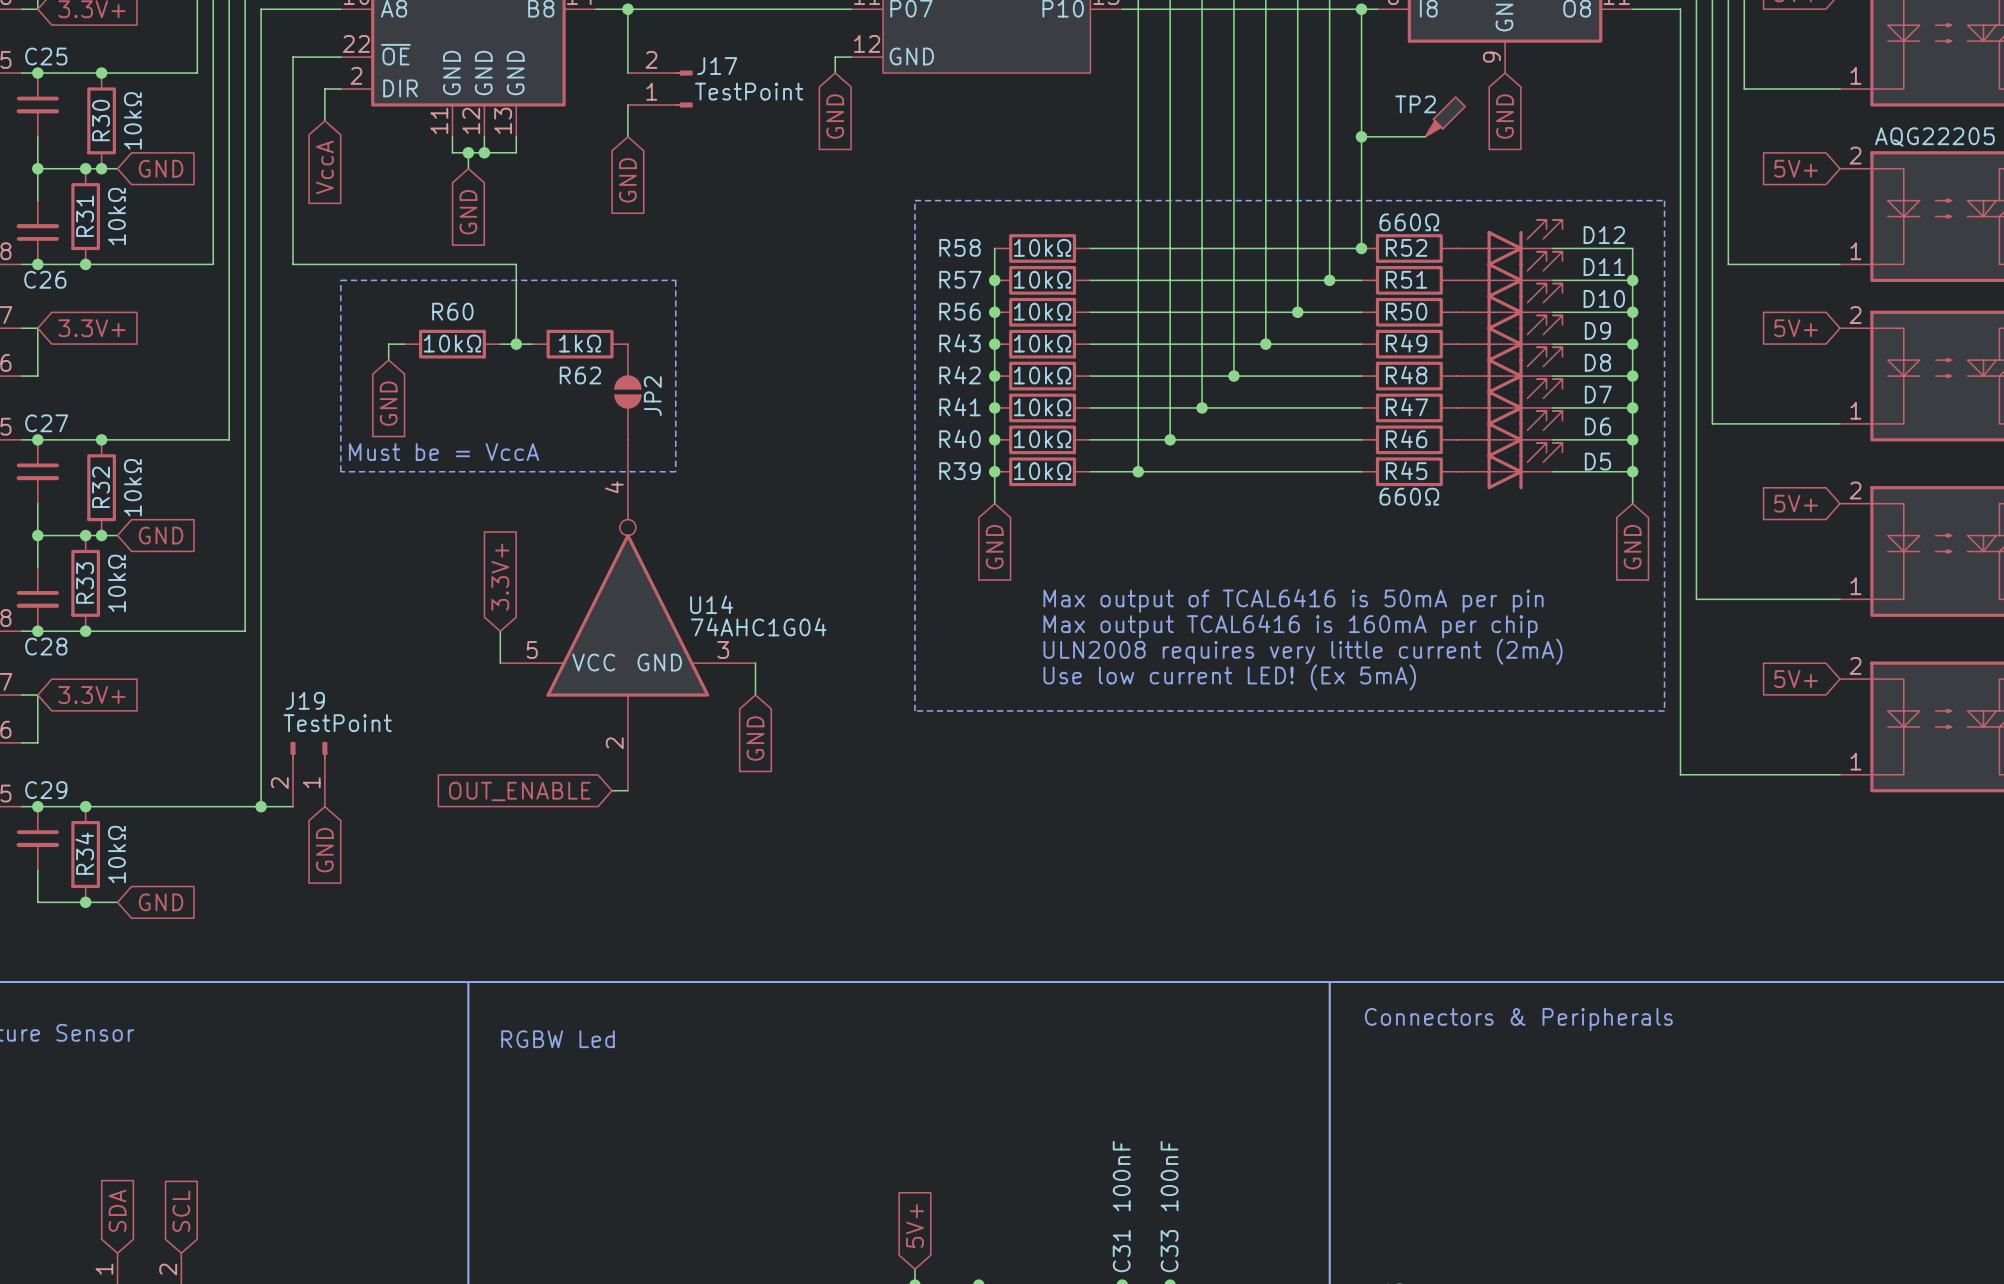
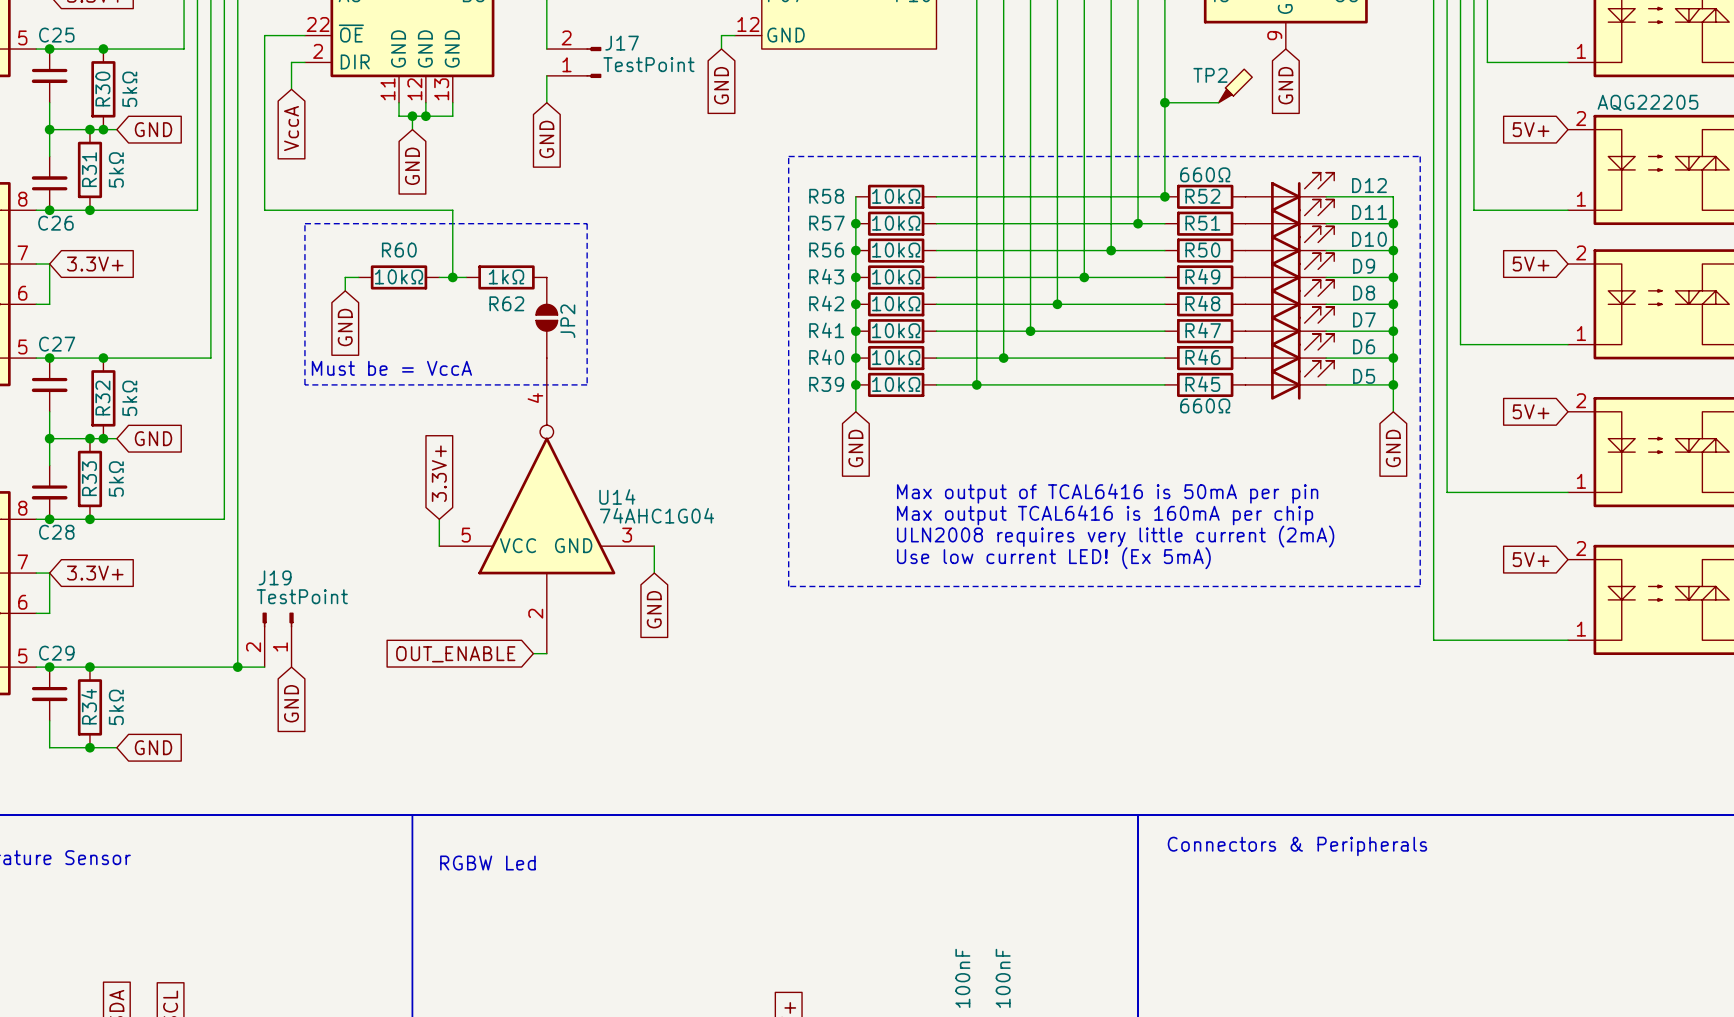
R30 value: 10kΩ (132, 120) -> 5kΩ (129, 89)
R31 value: 10kΩ (116, 216) -> 5kΩ (116, 169)
R32 value: 10kΩ (132, 487) -> 5kΩ (129, 398)
R33 value: 10kΩ (116, 583) -> 5kΩ (116, 478)
R34 value: 10kΩ (116, 854) -> 5kΩ (116, 707)

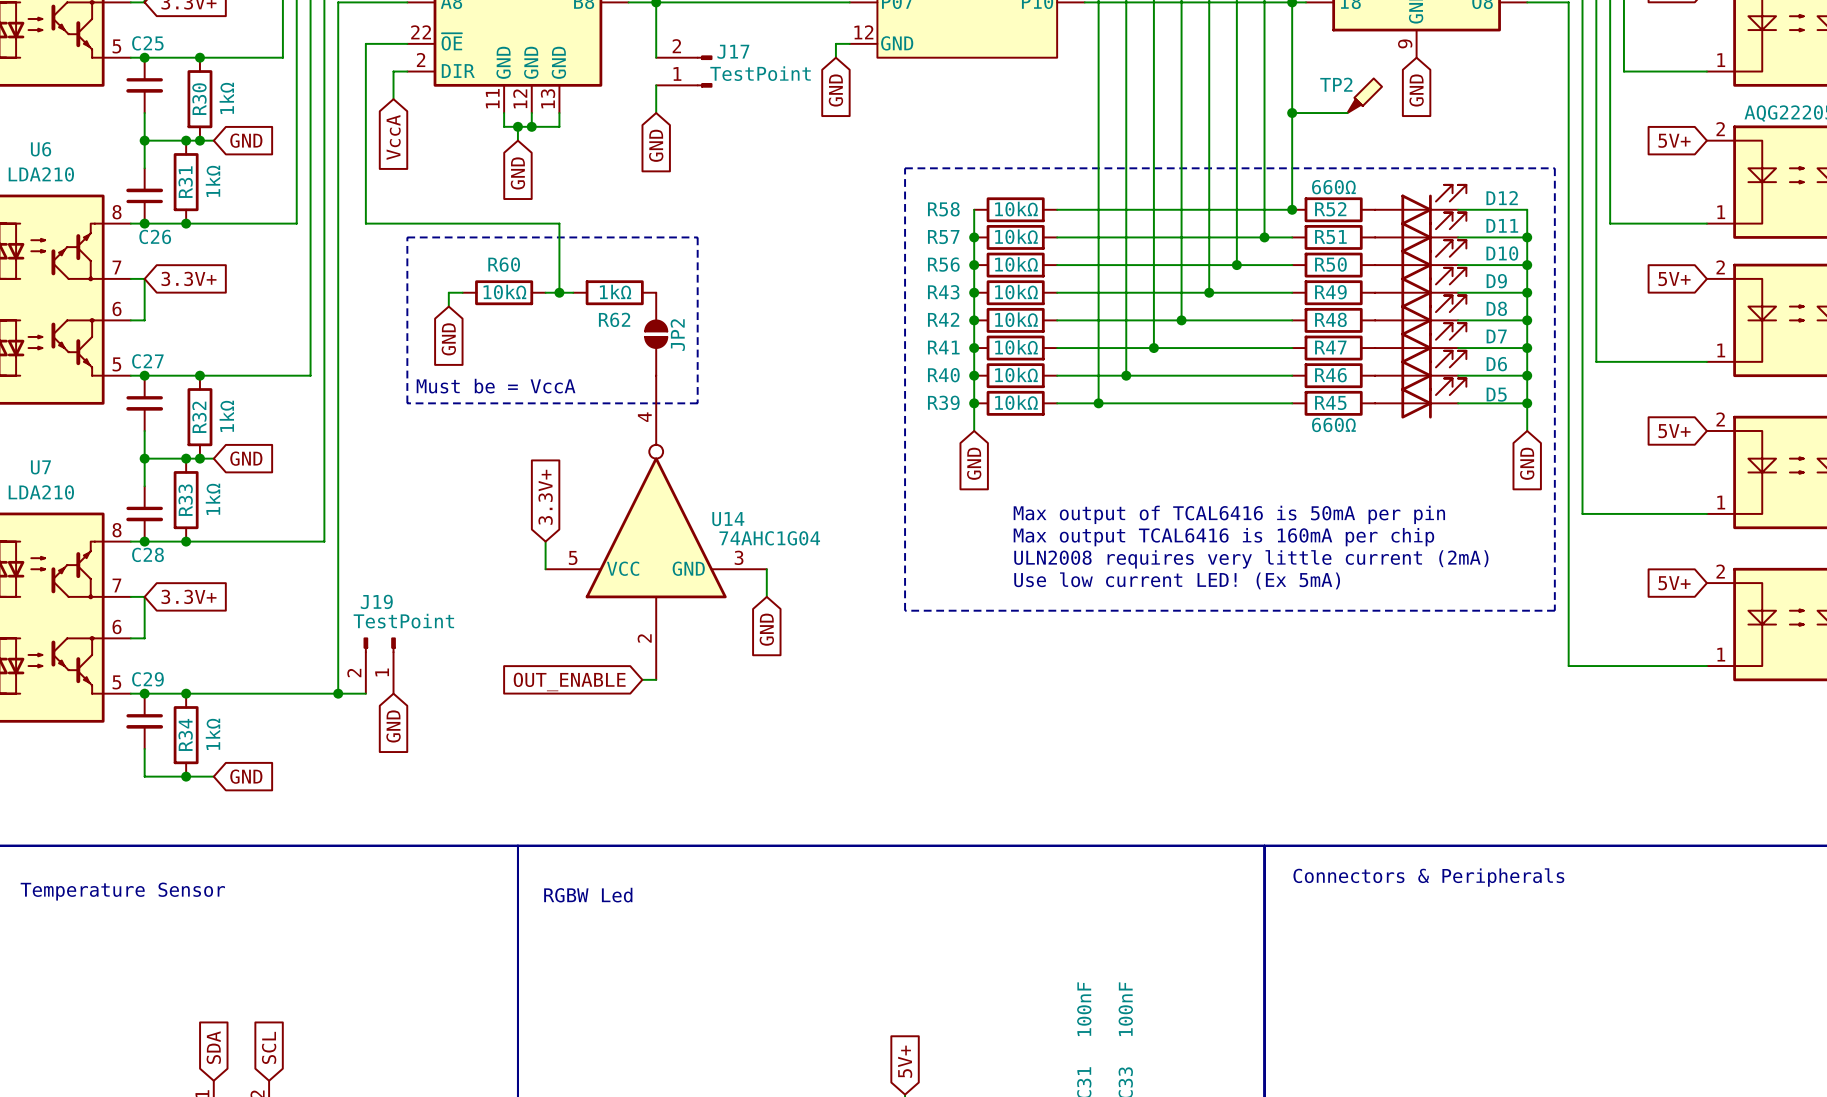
R30 value: 5kΩ (129, 89) -> 1kΩ (226, 98)
R31 value: 5kΩ (116, 169) -> 1kΩ (212, 181)
R32 value: 5kΩ (129, 398) -> 1kΩ (226, 416)
R33 value: 5kΩ (116, 478) -> 1kΩ (212, 499)
R34 value: 5kΩ (116, 707) -> 1kΩ (212, 734)

